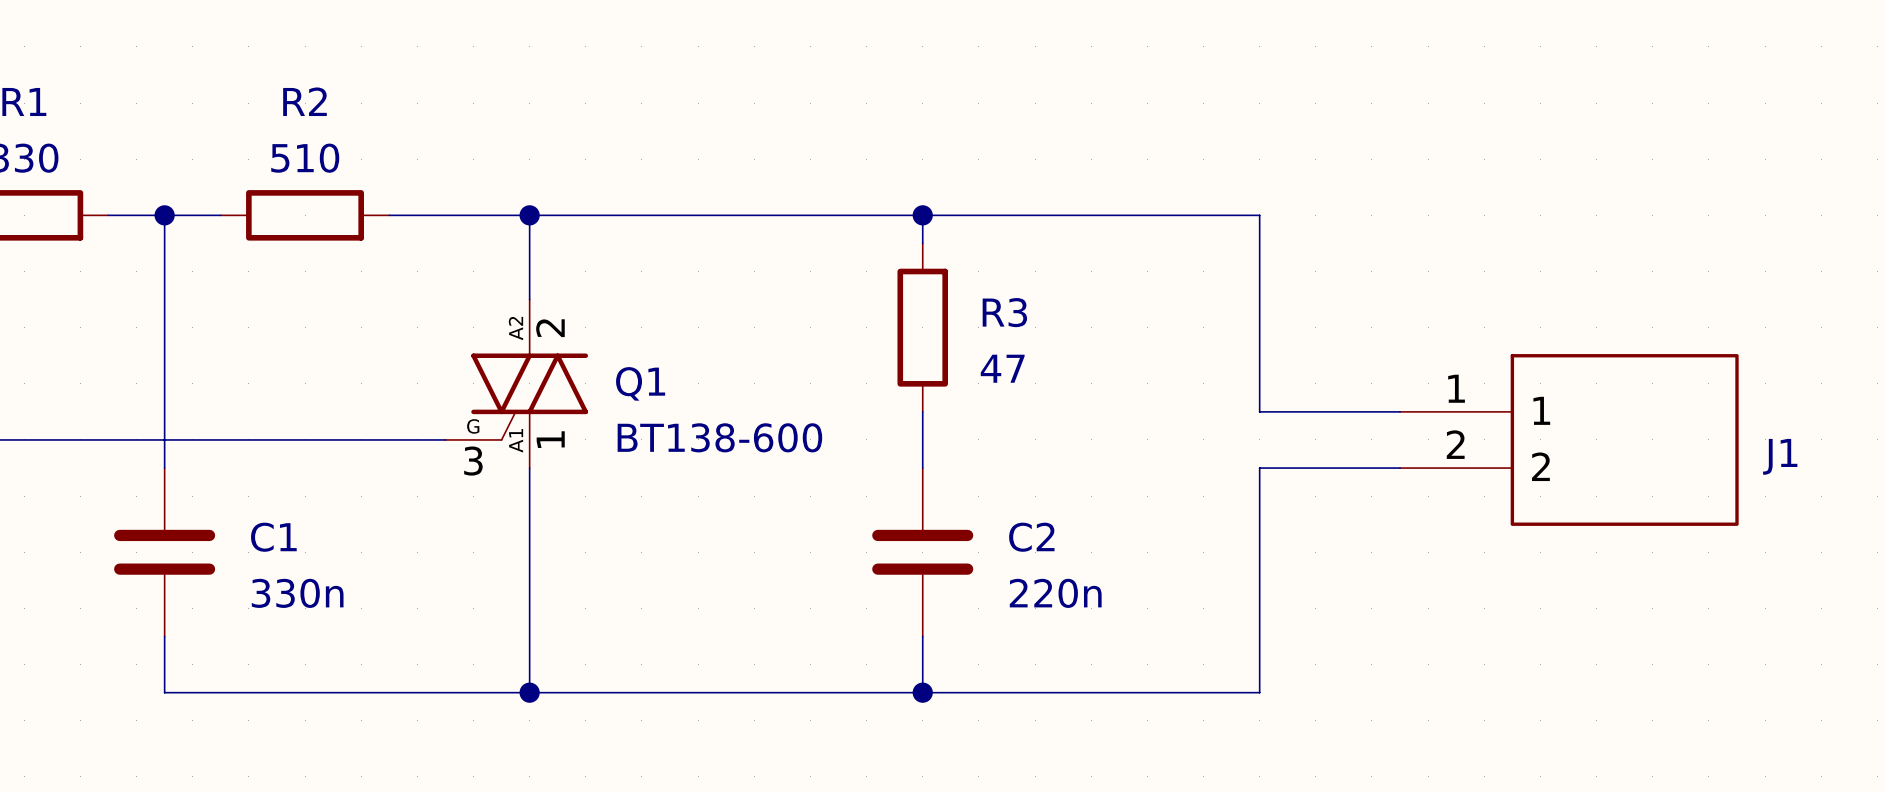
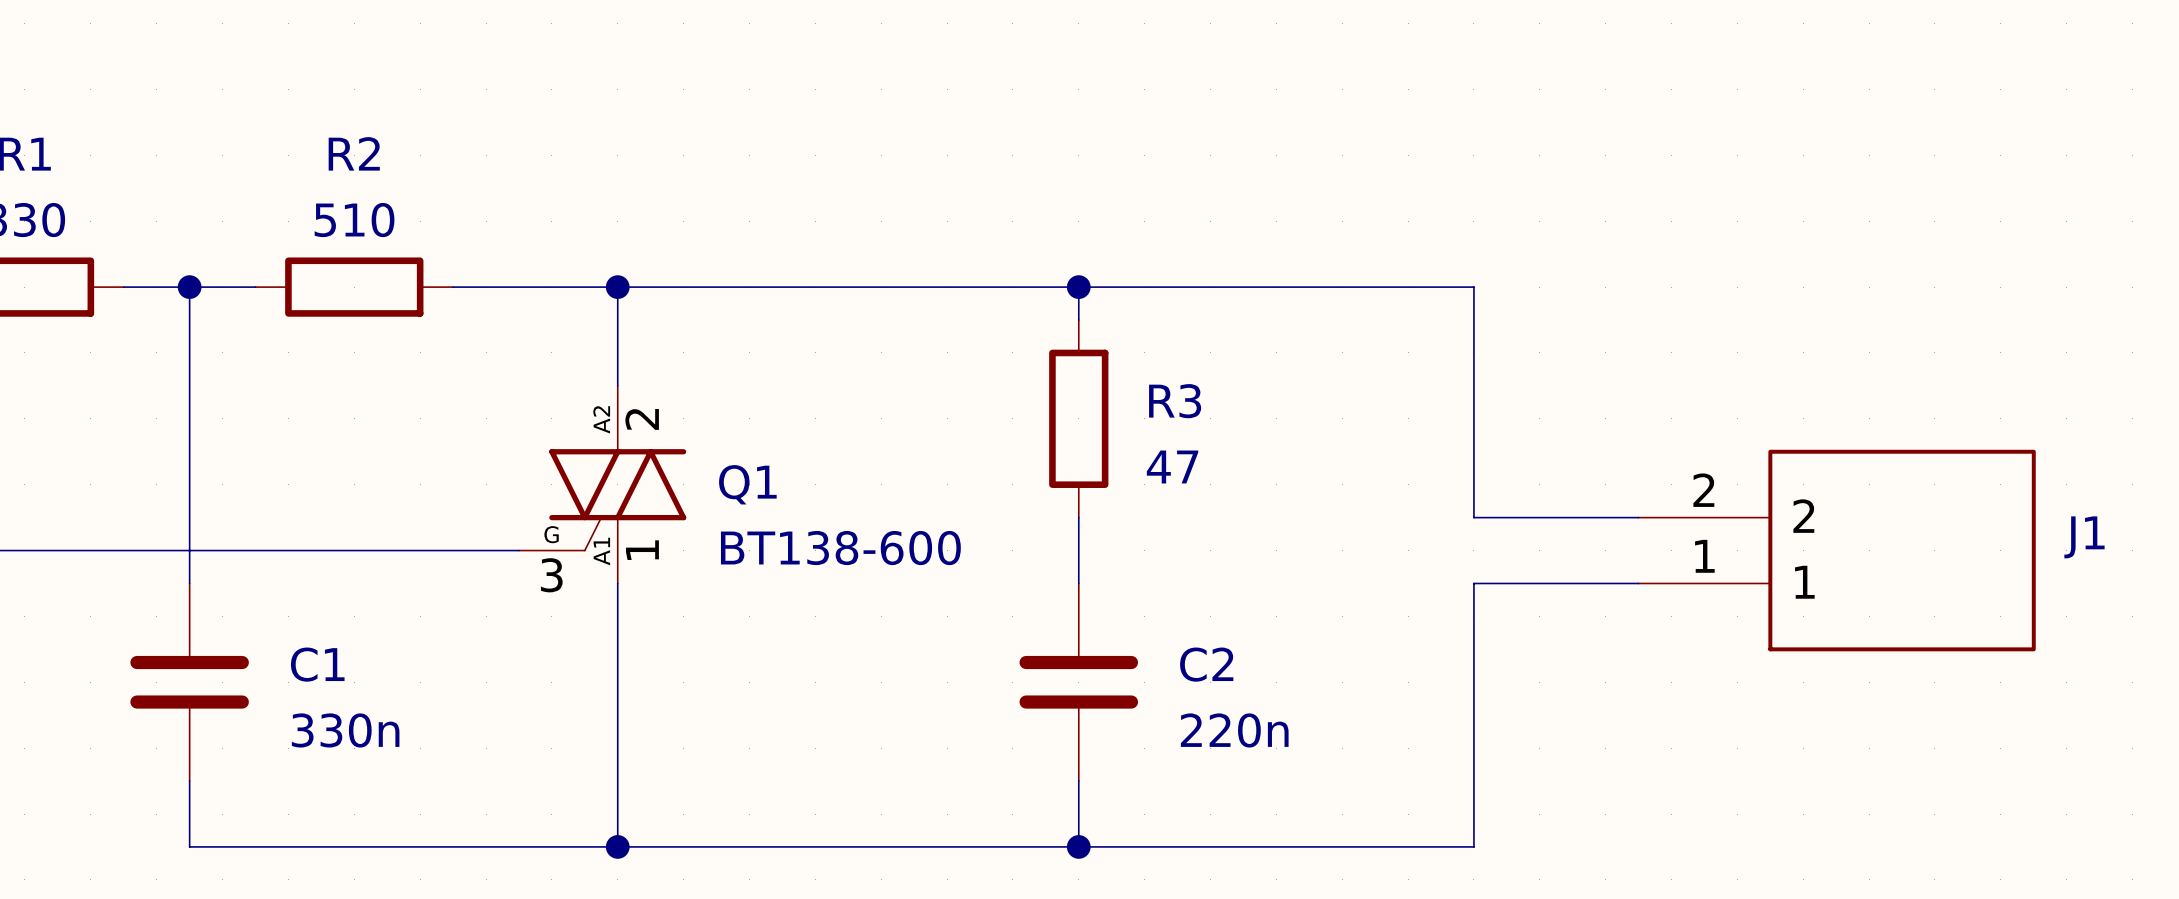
J1 flip: as is (1624, 439) -> up-down (1902, 550)

